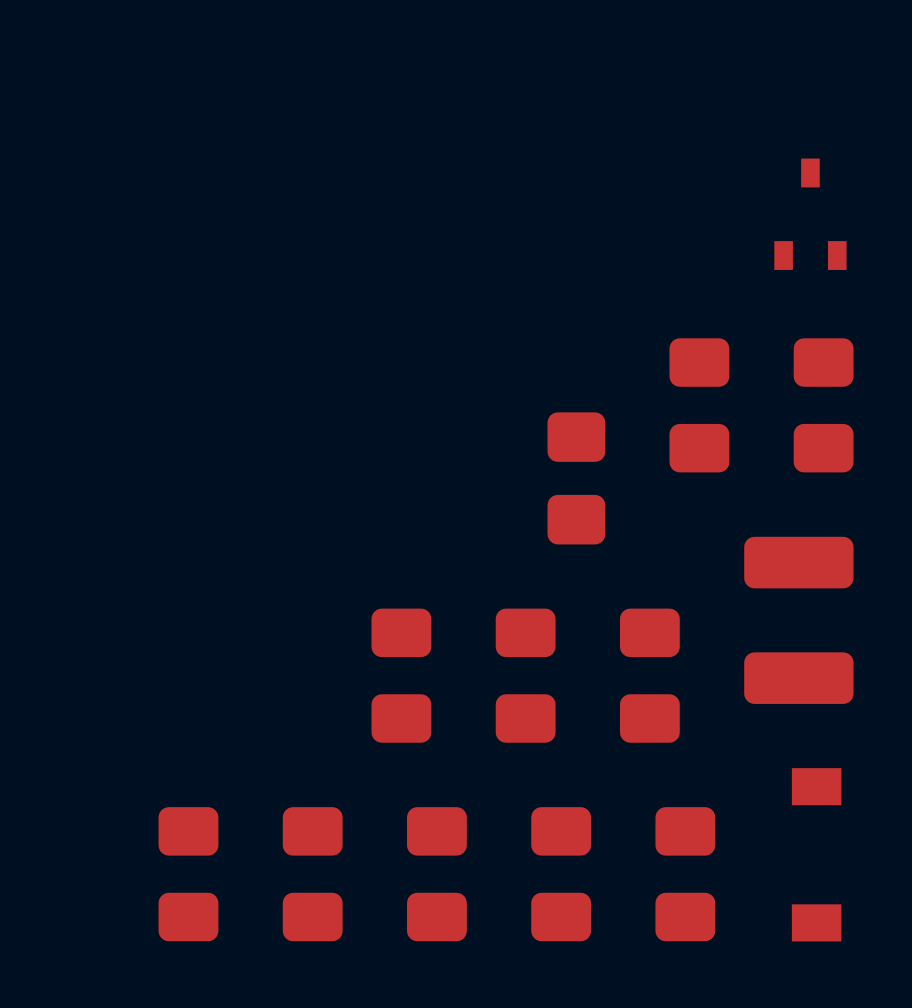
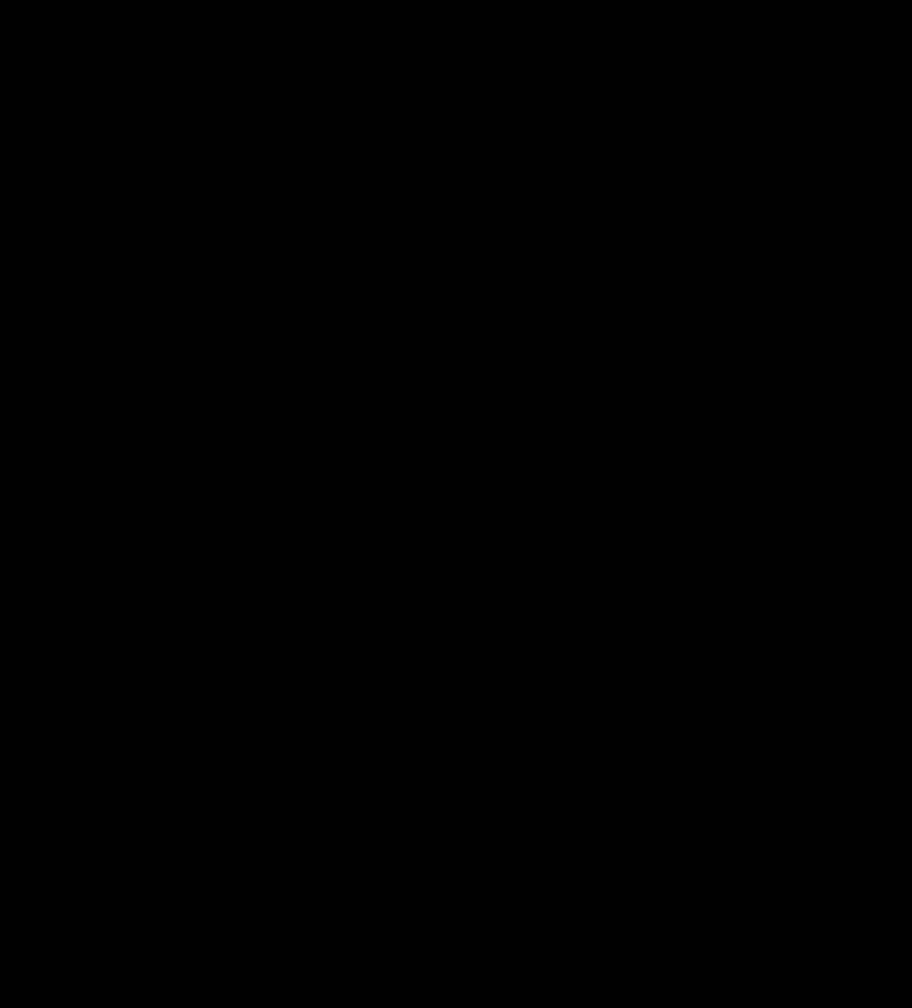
part: (810, 214) -> none
part: (699, 405) -> none
part: (823, 405) -> none
part: (576, 478) -> none
part: (798, 620) -> none
part: (401, 675) -> none
part: (525, 675) -> none
part: (649, 675) -> none
part: (816, 854) -> none
part: (188, 874) -> none
part: (312, 874) -> none
part: (436, 874) -> none
part: (561, 874) -> none
part: (685, 874) -> none

